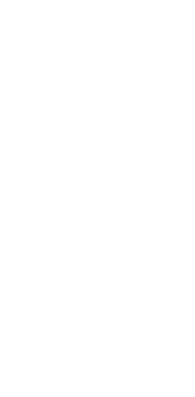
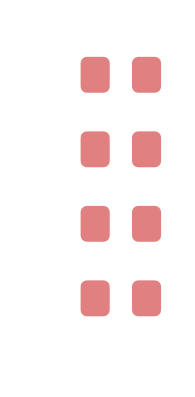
part: none -> (120, 74)
part: none -> (120, 149)
part: none -> (120, 223)
part: none -> (120, 298)

